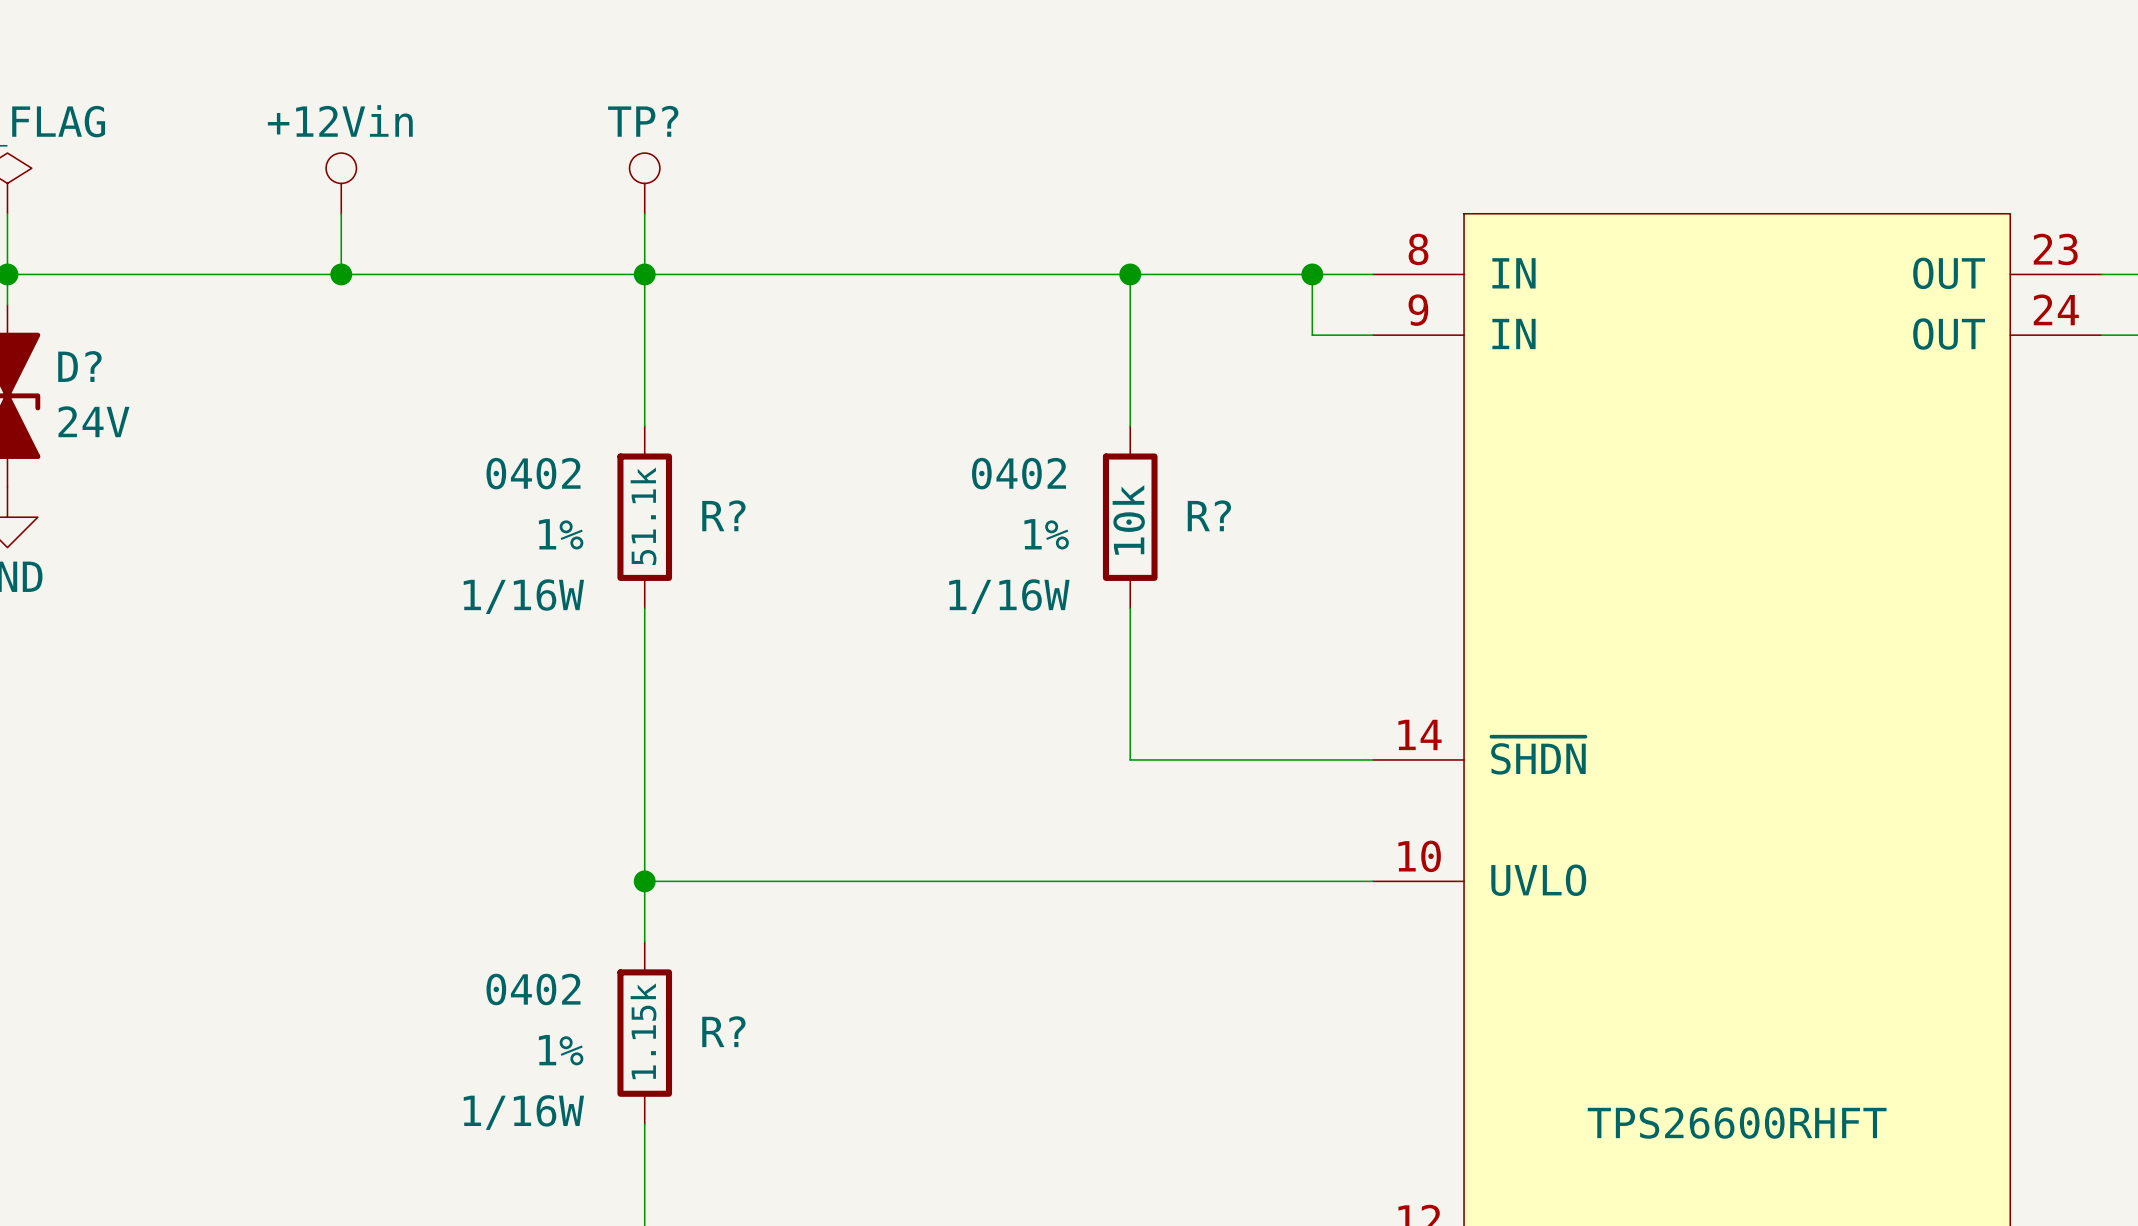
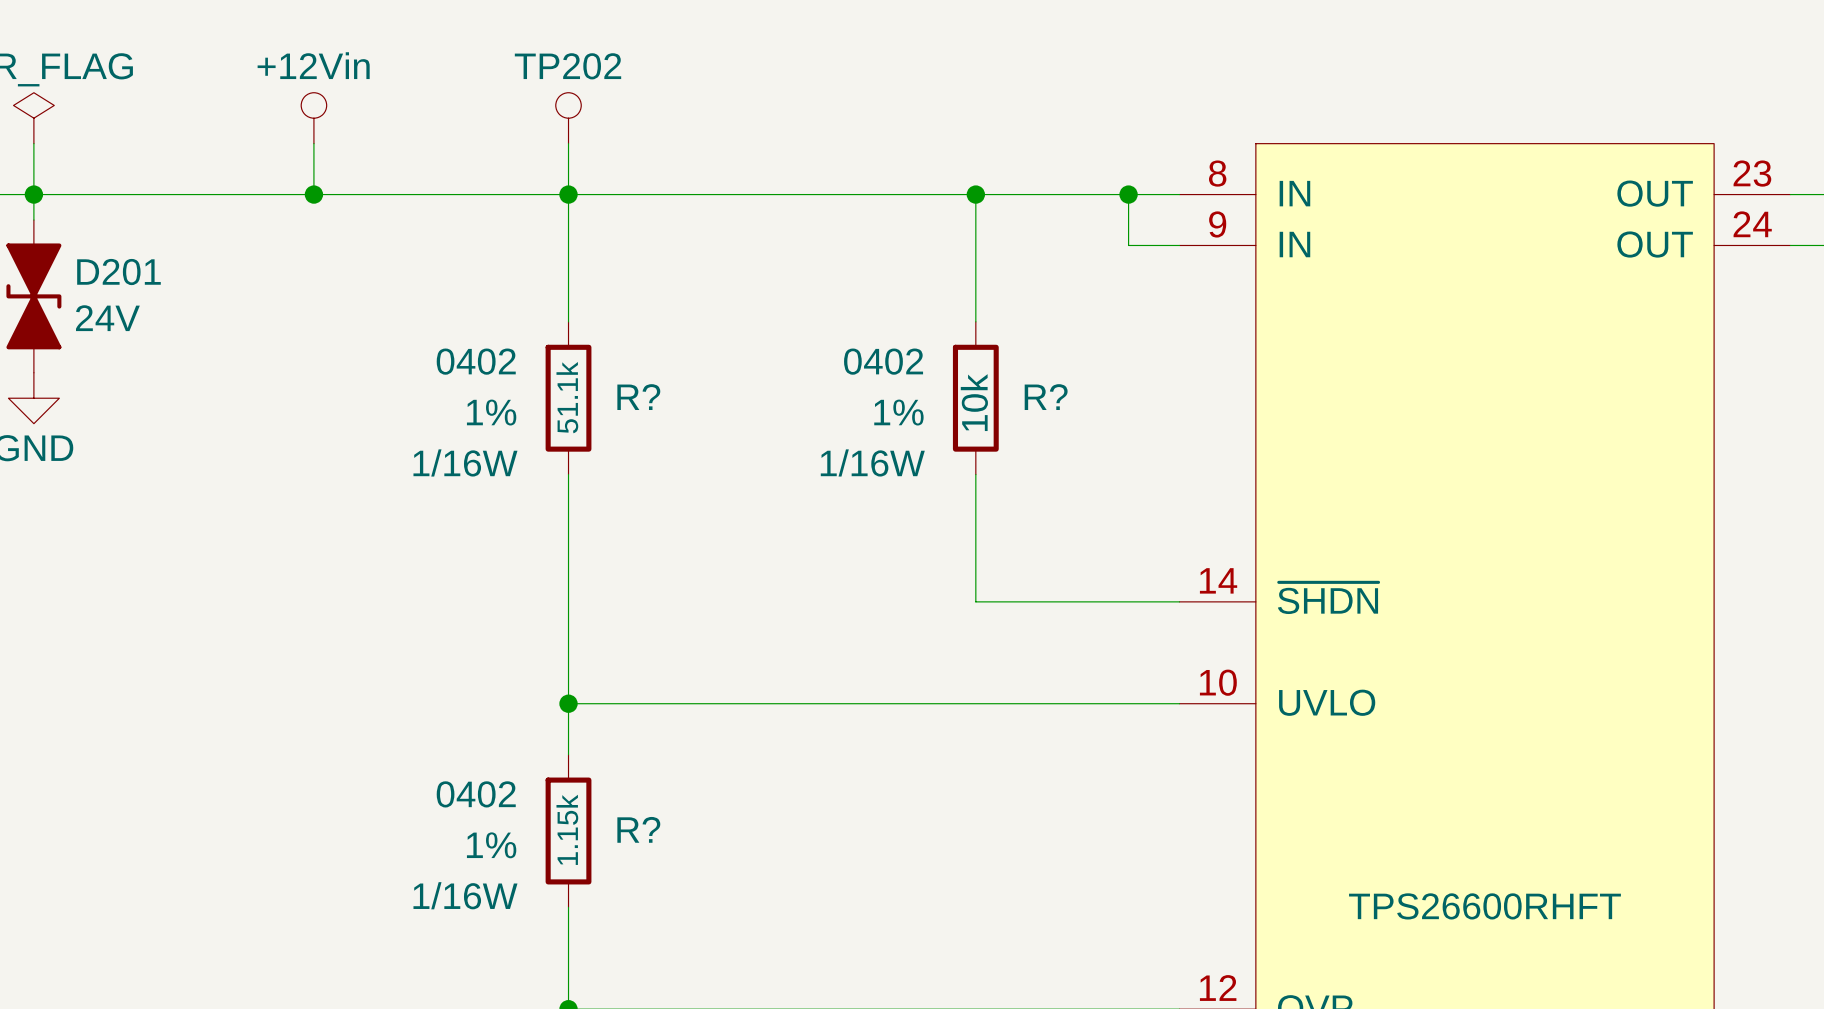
TP? name: TP? (643, 121) -> TP202 (568, 66)
D? name: D? (79, 366) -> D201 (118, 272)

